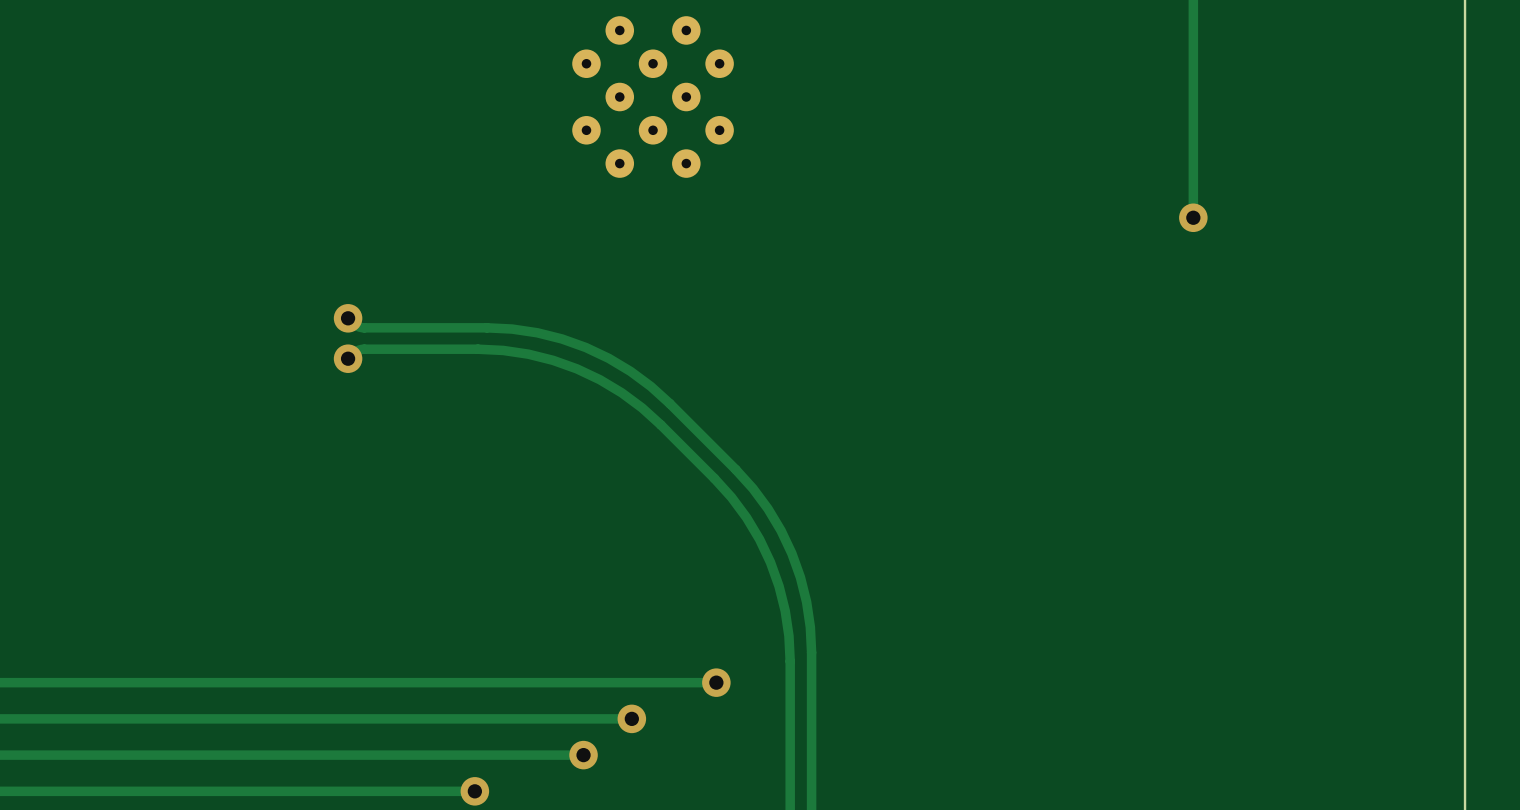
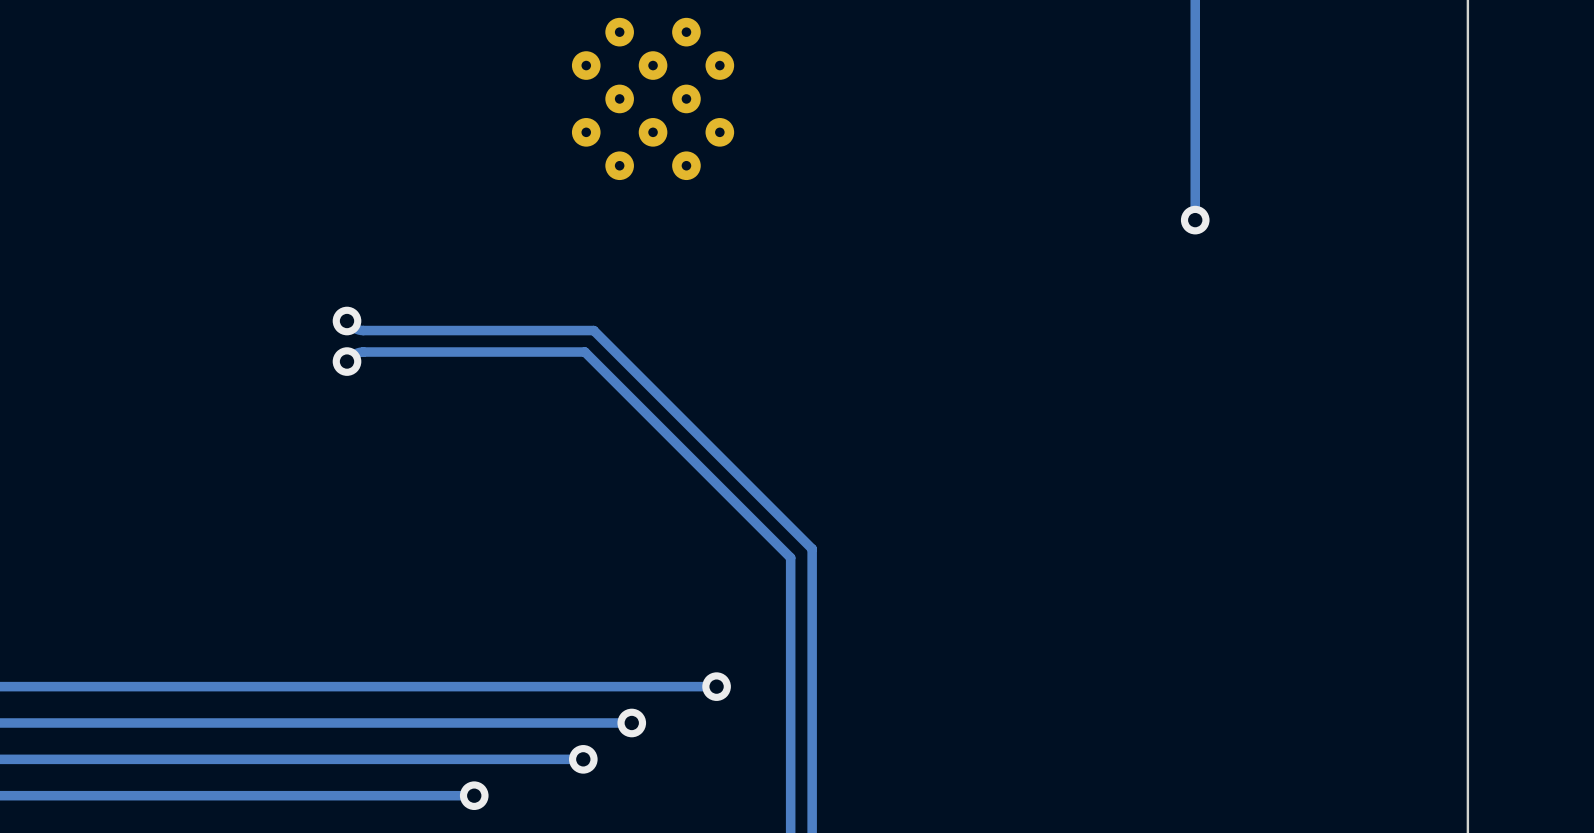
track: (486, 327) (537, 332) (585, 347) (630, 371) (669, 403) -> (486, 330) (593, 330) (669, 406)
track: (477, 349) (528, 354) (576, 368) (621, 392) (660, 424) -> (477, 352) (584, 352) (660, 428)
track: (735, 469) (767, 508) (791, 553) (806, 602) (811, 652) -> (736, 472) (812, 548) (812, 656)
track: (714, 478) (746, 517) (770, 562) (785, 610) (790, 661) -> (714, 481) (790, 557) (790, 665)

